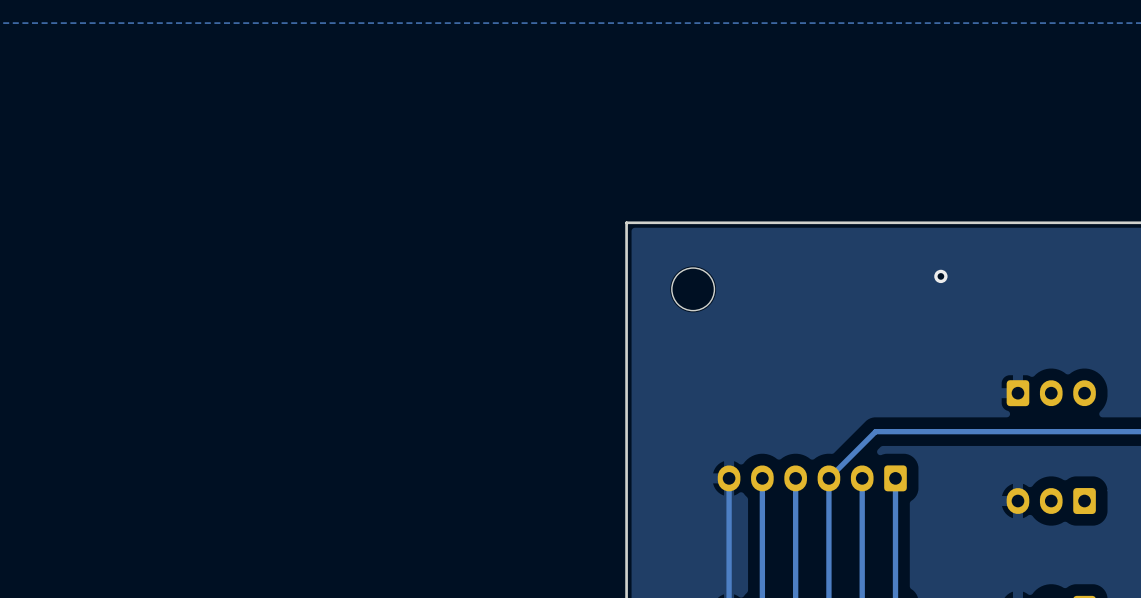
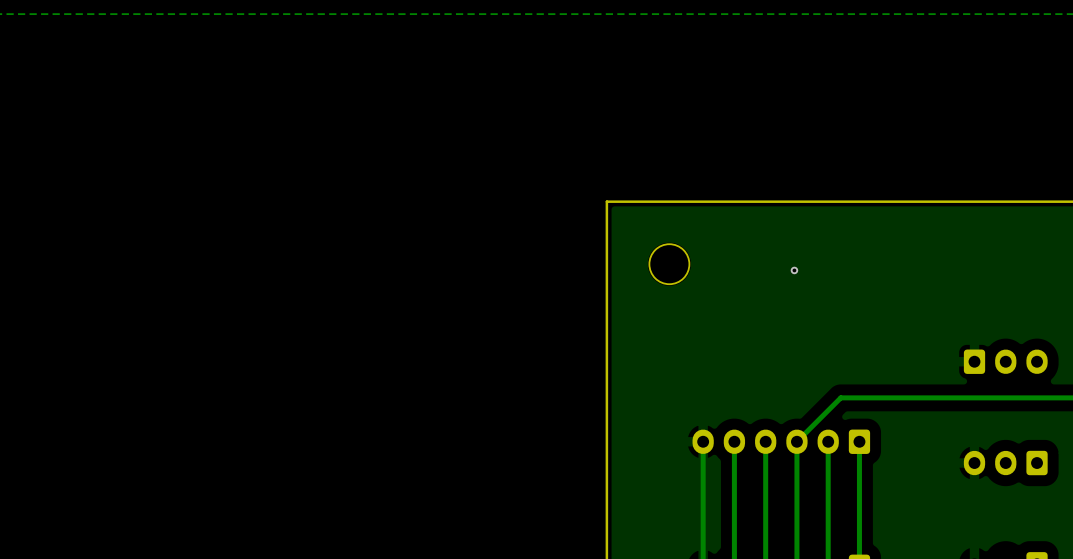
via: (940, 276) -> none
via: none -> (794, 270)

